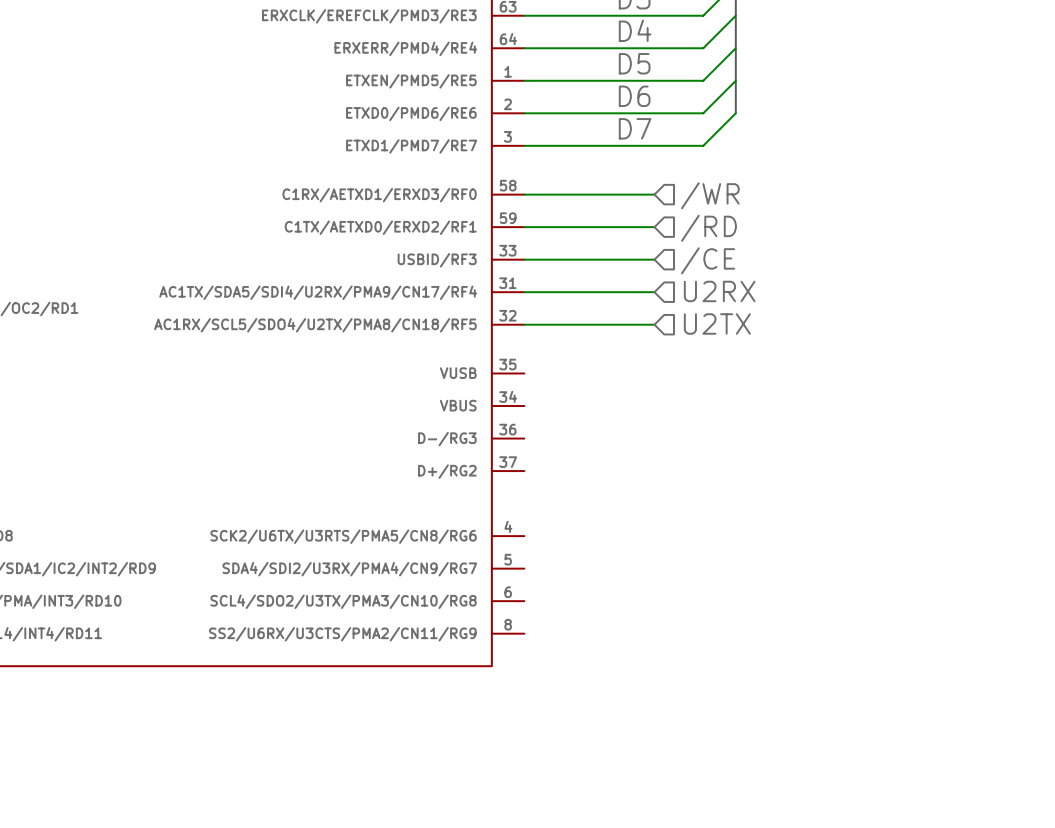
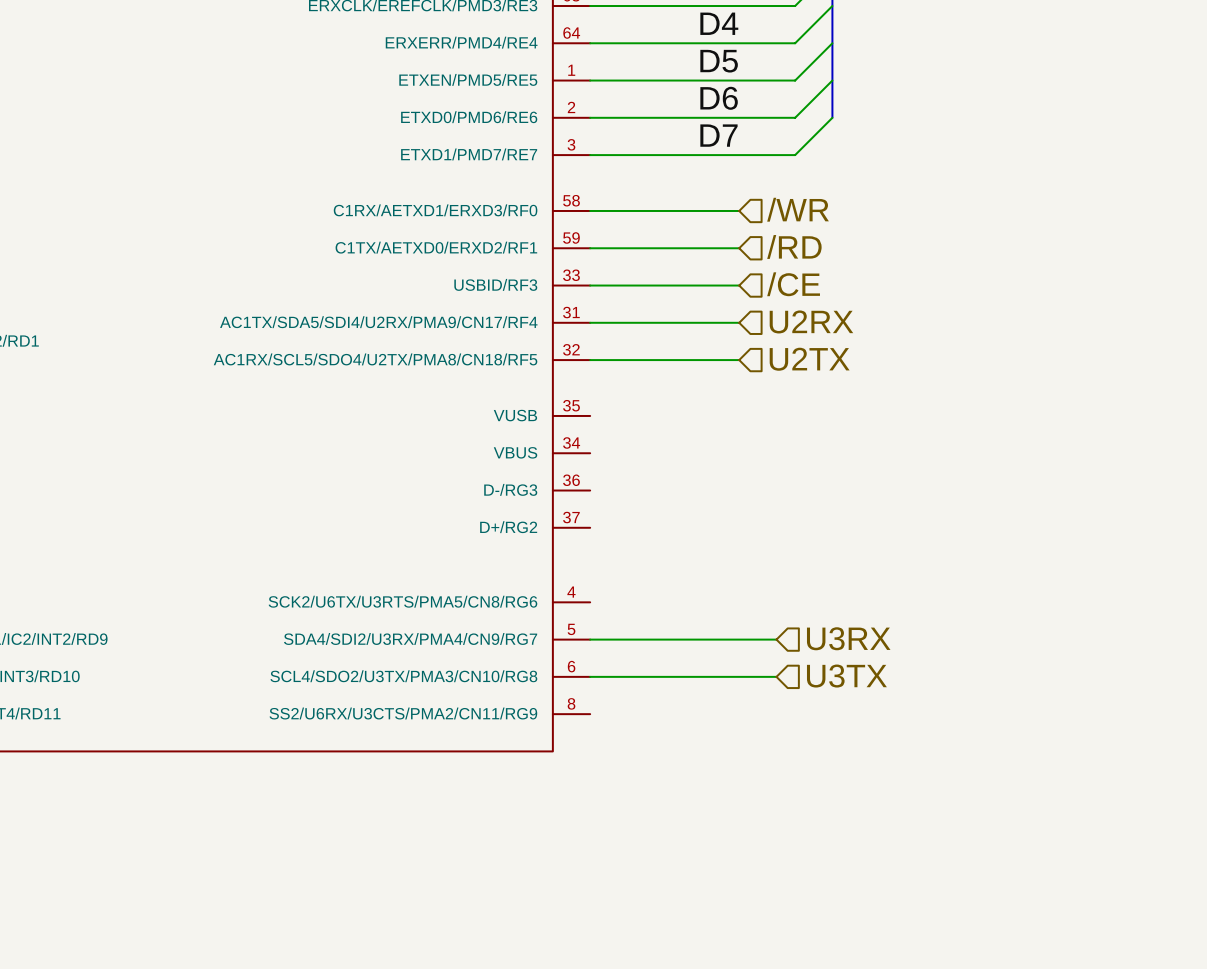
hierarchical label: none -> U3RX (848, 638)
wire: none -> (590, 639) (776, 639)
hierarchical label: none -> U3TX (846, 676)
wire: none -> (590, 676) (776, 676)

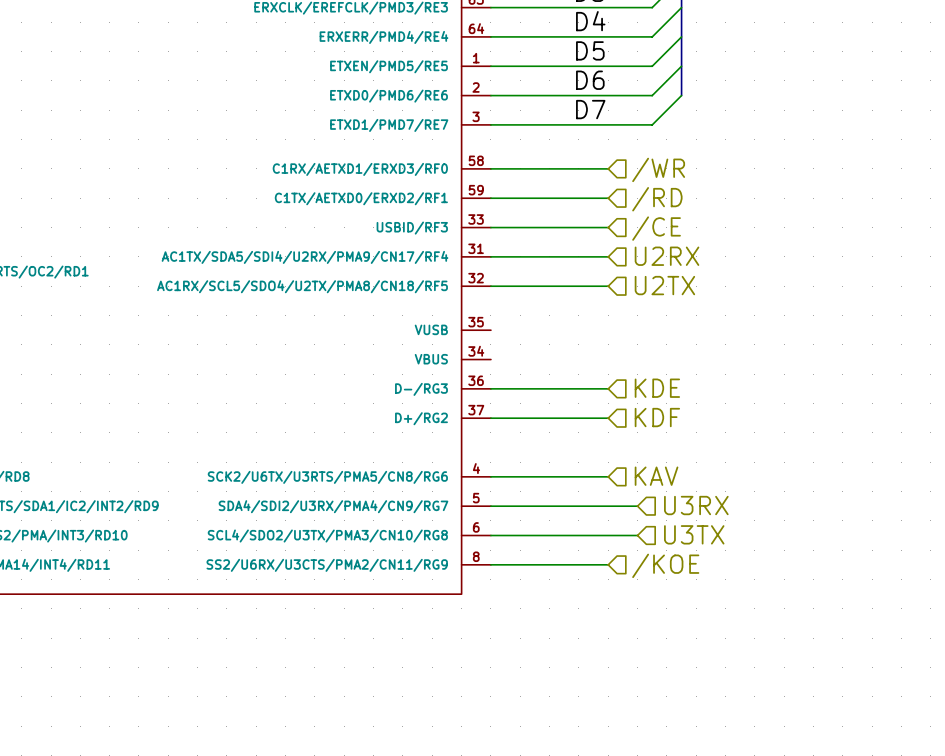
hierarchical label: none -> KDE (657, 388)
wire: none -> (490, 388) (608, 388)
hierarchical label: none -> KDF (657, 417)
wire: none -> (490, 418) (608, 418)
hierarchical label: none -> KAV (656, 476)
wire: none -> (490, 476) (608, 476)
hierarchical label: none -> /KOE (665, 565)
wire: none -> (490, 564) (608, 564)

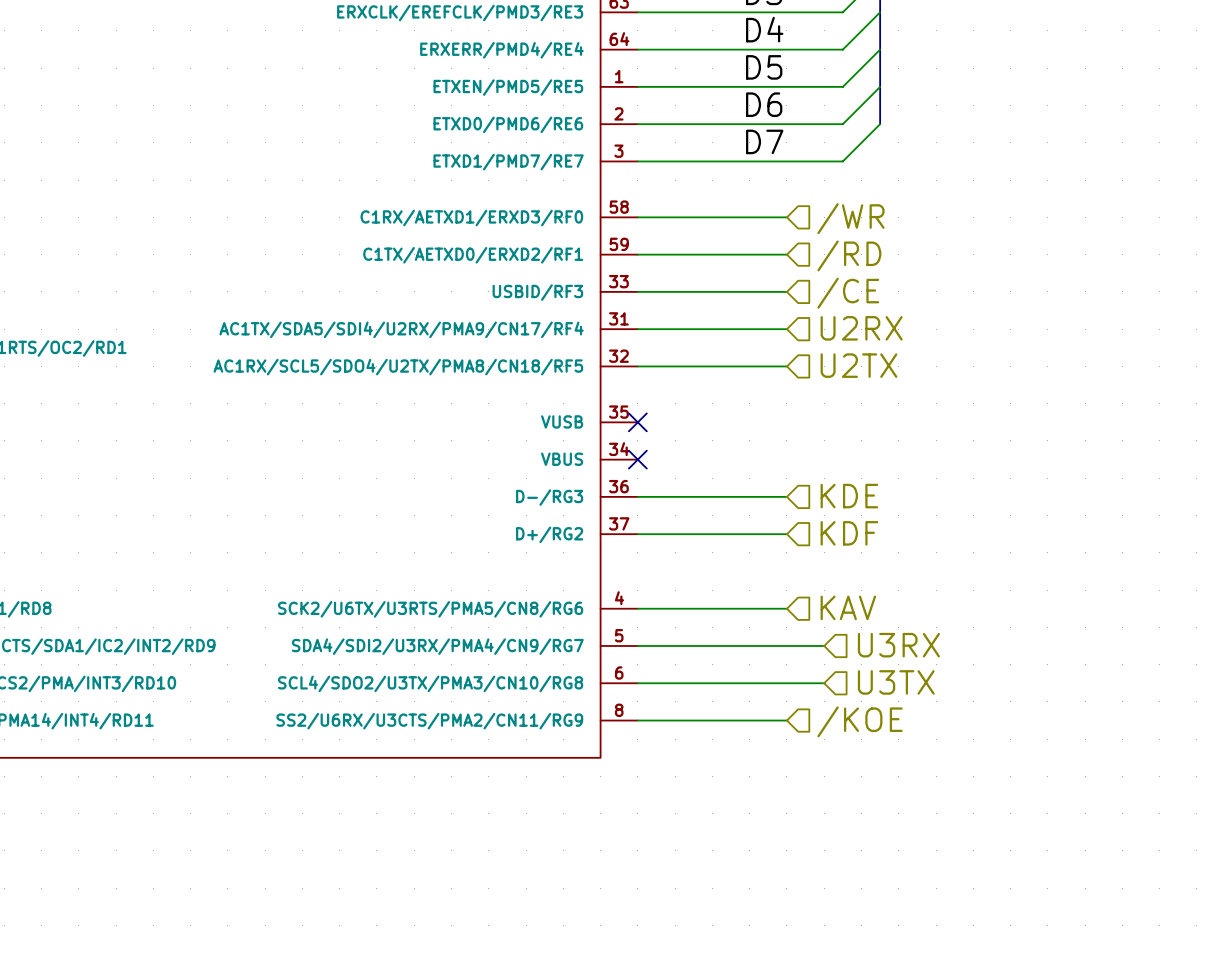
no-connect mark: none -> (637, 422)
no-connect mark: none -> (637, 459)

